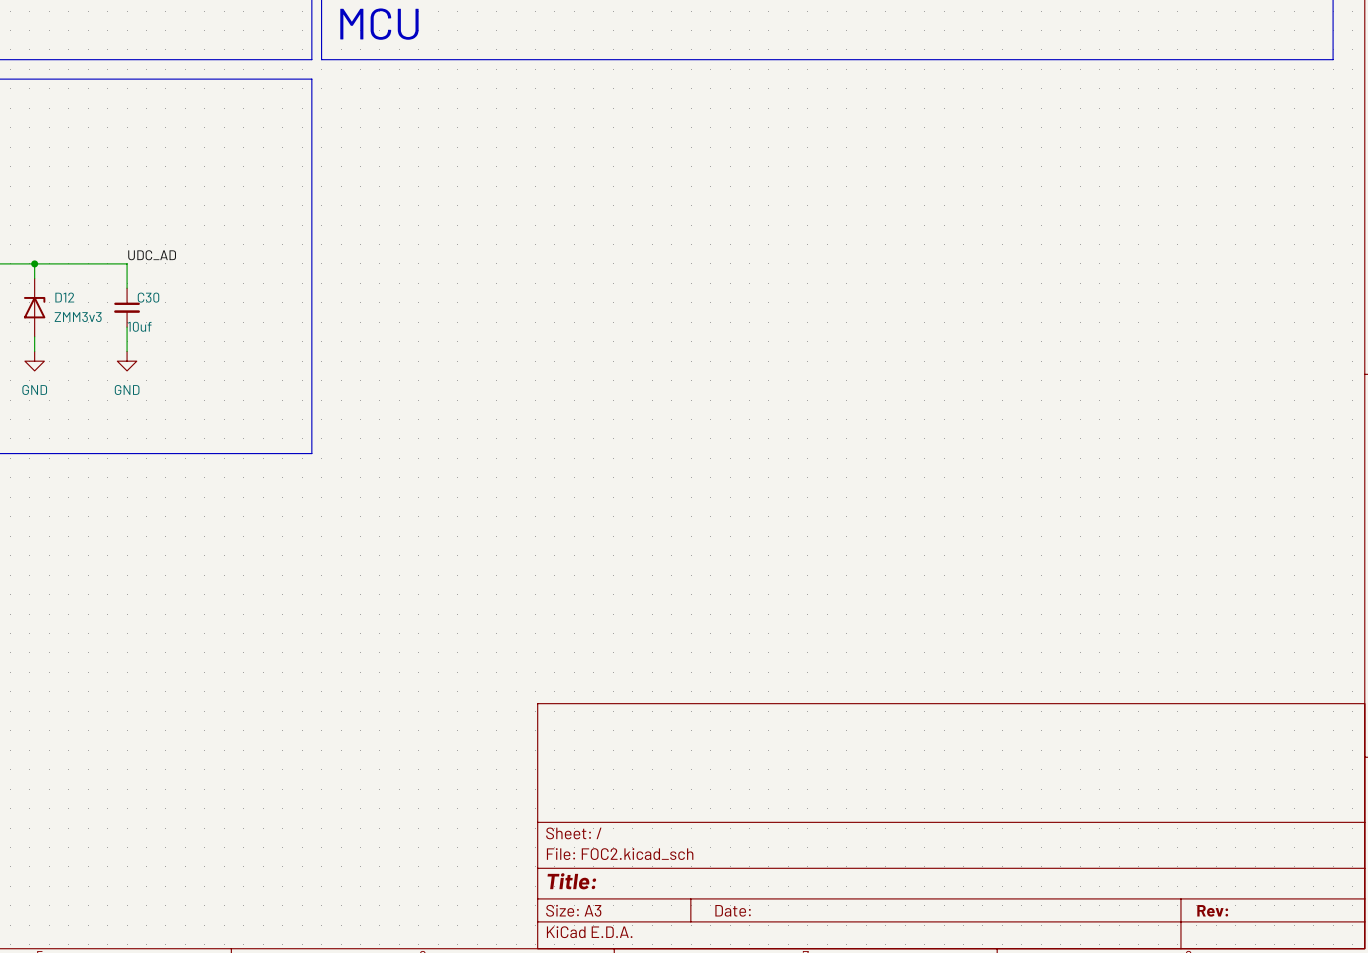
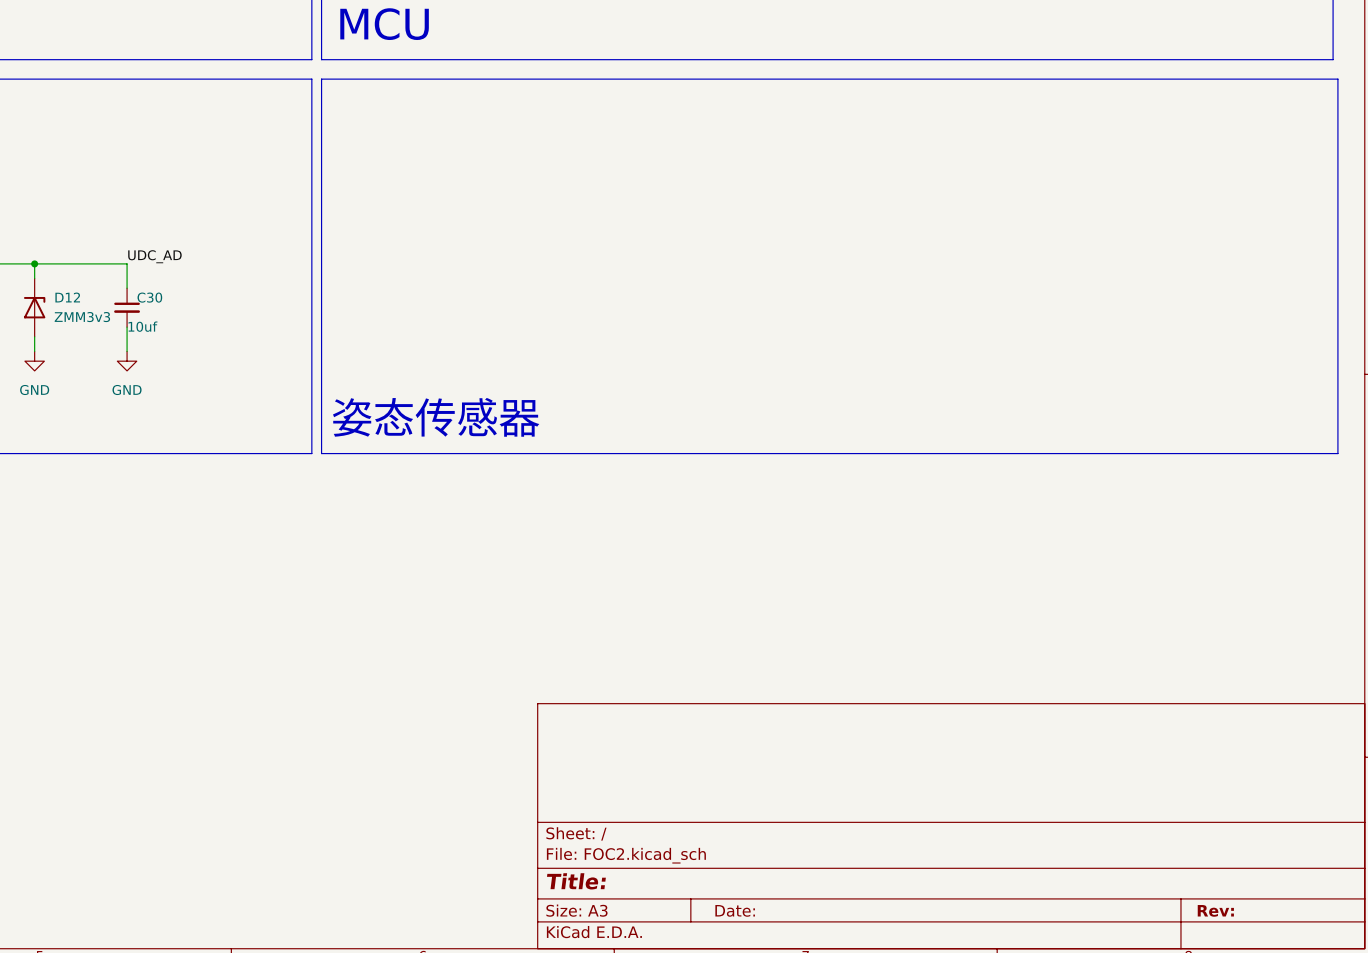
line: none -> (321, 79) (1337, 79) (1337, 453) (321, 453) (321, 79)
text: none -> 姿态传感器 (436, 417)

